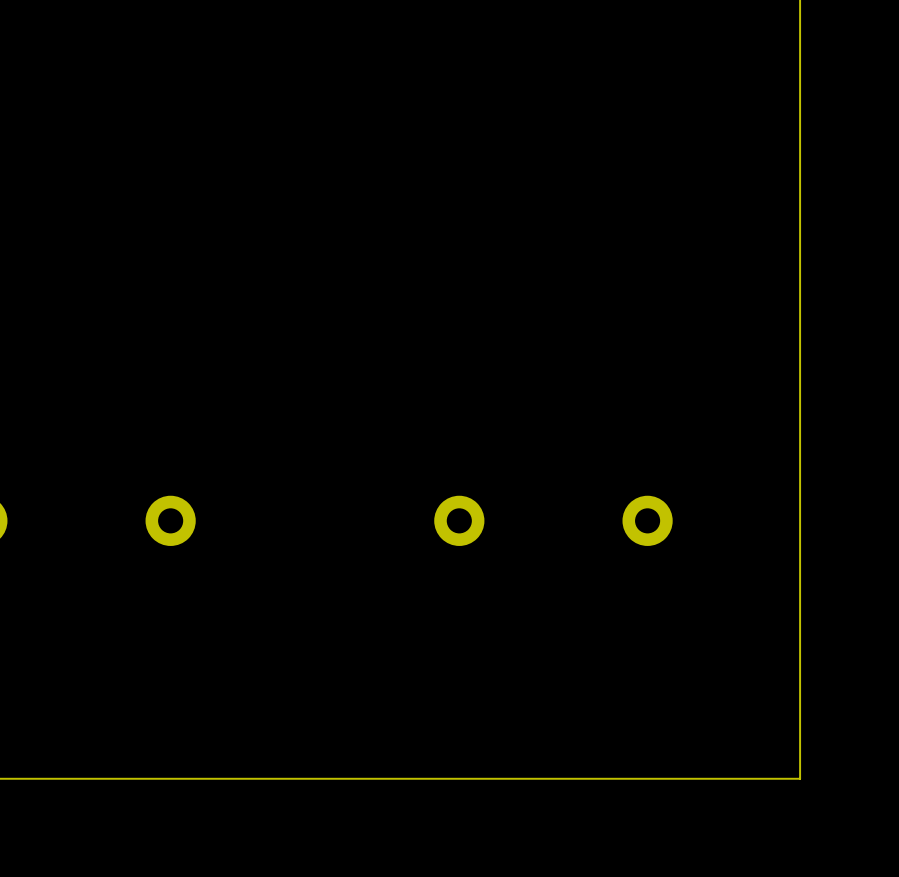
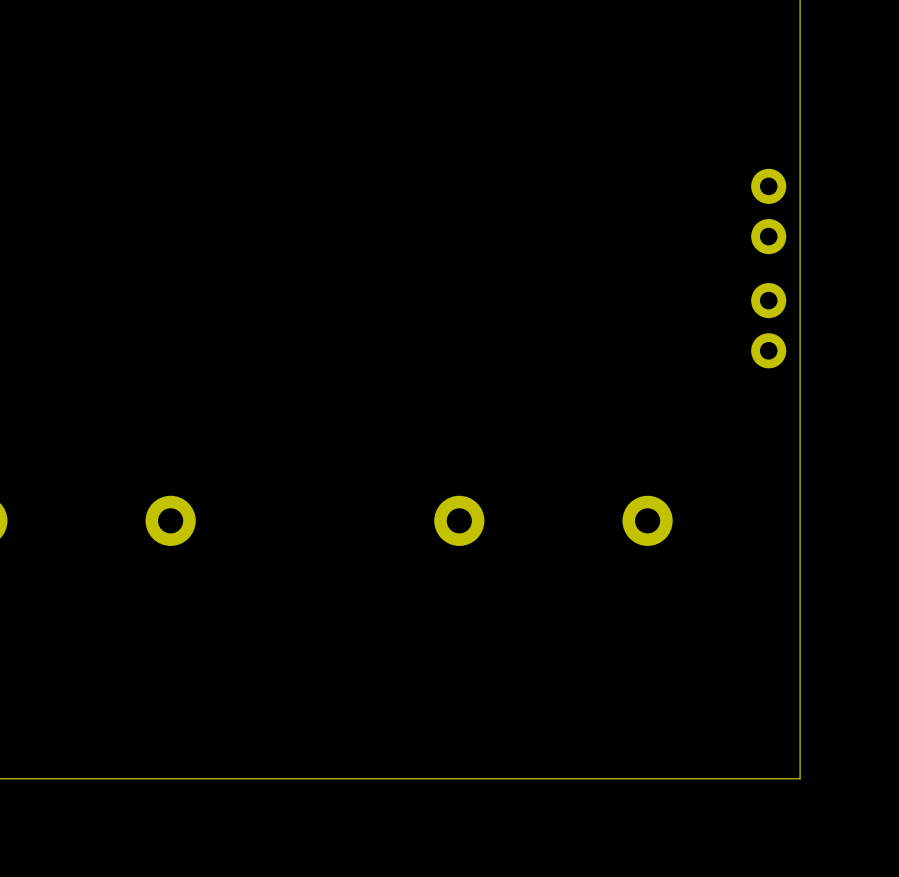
part: none -> (768, 211)
part: none -> (768, 325)

